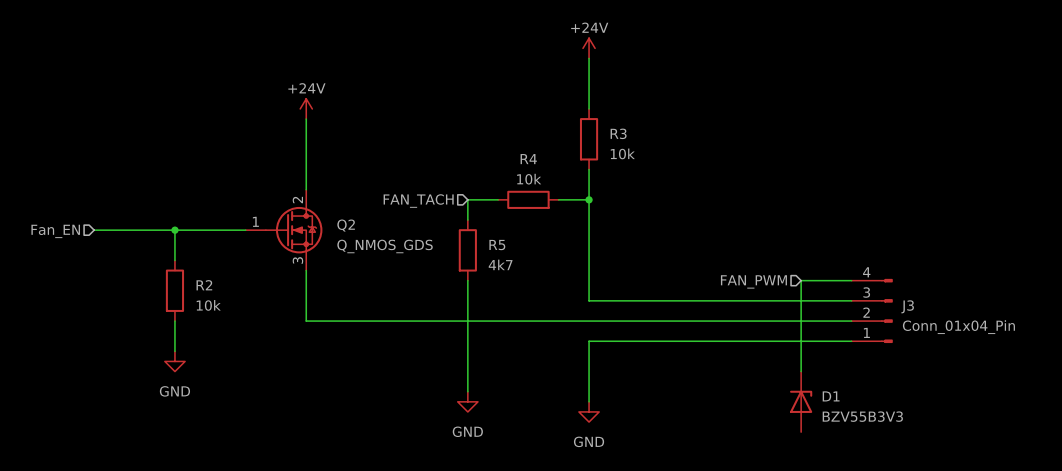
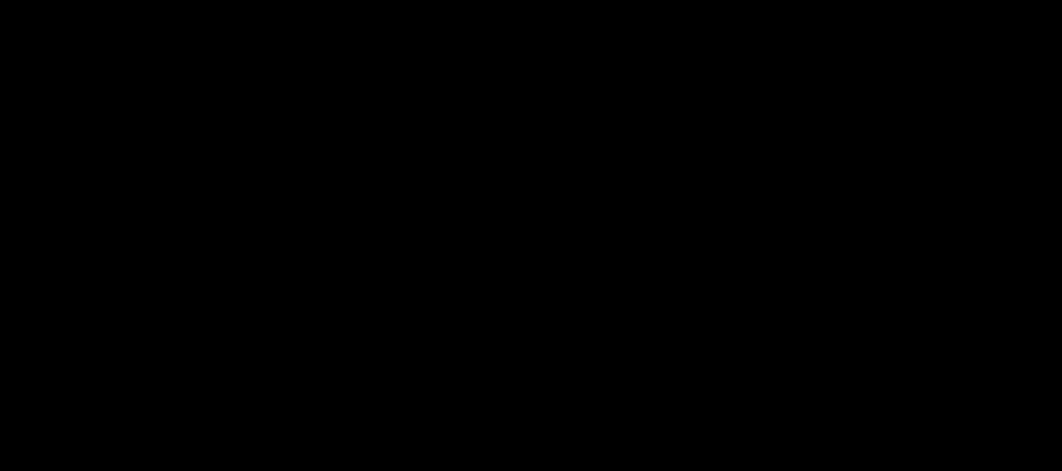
power symbol: +24V (589, 48) -> none
wire: (589, 58) (589, 108) -> none
power symbol: +24V (306, 108) -> none
wire: (306, 119) (306, 189) -> none
R3: 10k (589, 139) -> none
wire: (589, 169) (589, 300) (851, 300) -> none
wire: (498, 199) (467, 199) (467, 220) -> none
R4: 10k (528, 199) -> none
wire: (558, 199) (589, 199) -> none
junction: (589, 199) -> none
hierarchical label: FAN_TACH (418, 201) -> none
wire: (94, 230) (245, 230) -> none
wire: (174, 230) (174, 260) -> none
junction: (174, 230) -> none
Q2: Q_NMOS_GDS (284, 230) -> none
hierarchical label: Fan_EN (55, 231) -> none
R5: 4k7 (467, 250) -> none
wire: (306, 270) (306, 321) (851, 321) -> none
wire: (467, 280) (467, 391) -> none
wire: (851, 280) (801, 280) (801, 371) -> none
hierarchical label: FAN_PWM (753, 281) -> none
R2: 10k (174, 290) -> none
J3: Conn_01x04_Pin (872, 310) -> none
wire: (174, 321) (174, 351) -> none
wire: (851, 341) (589, 341) (589, 401) -> none
power symbol: GND (174, 361) -> none
power symbol: GND (467, 401) -> none
D1: BZV55B3V3 (801, 401) -> none
power symbol: GND (589, 411) -> none

